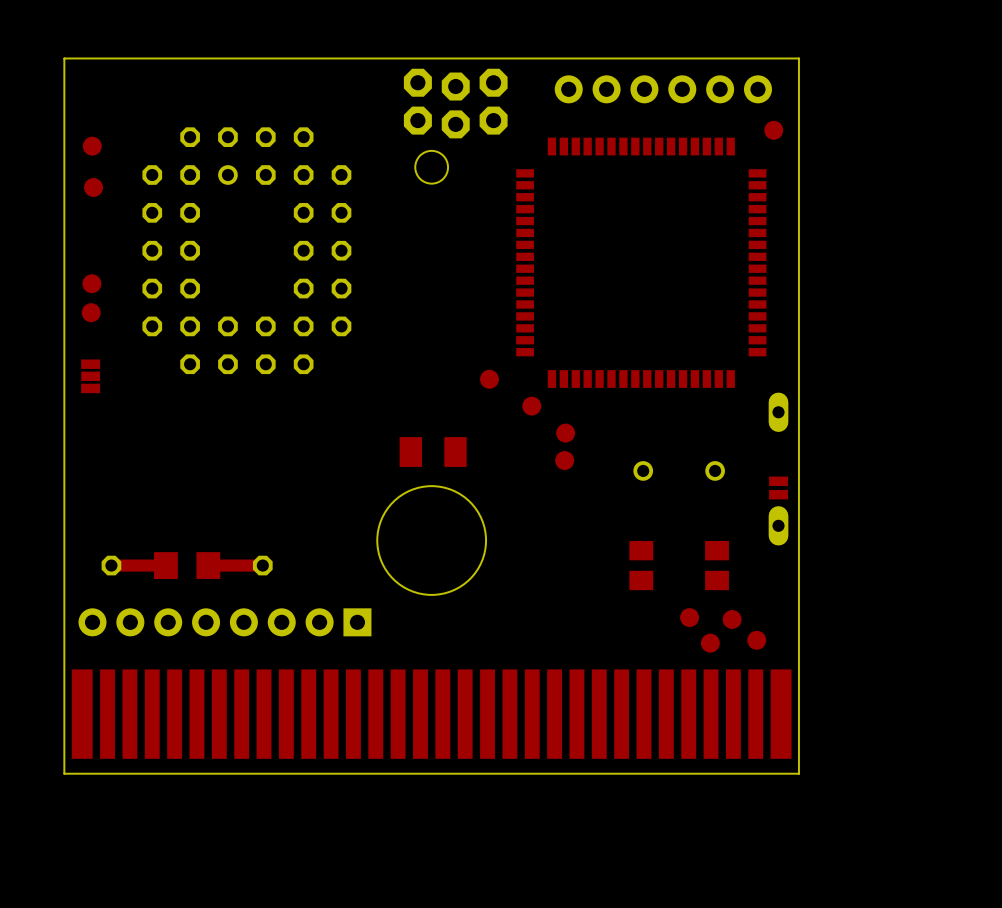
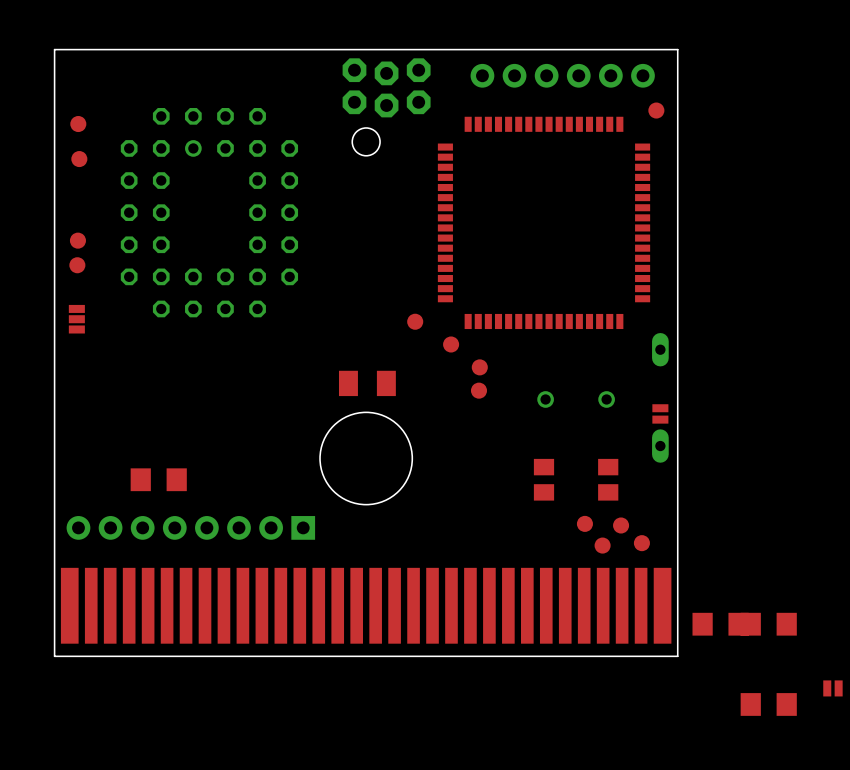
part footprint: [101, 552, 273, 579] -> [130, 468, 187, 492]
part: none -> (720, 624)
part: none -> (768, 624)
part: none -> (832, 688)
part: none -> (768, 704)

